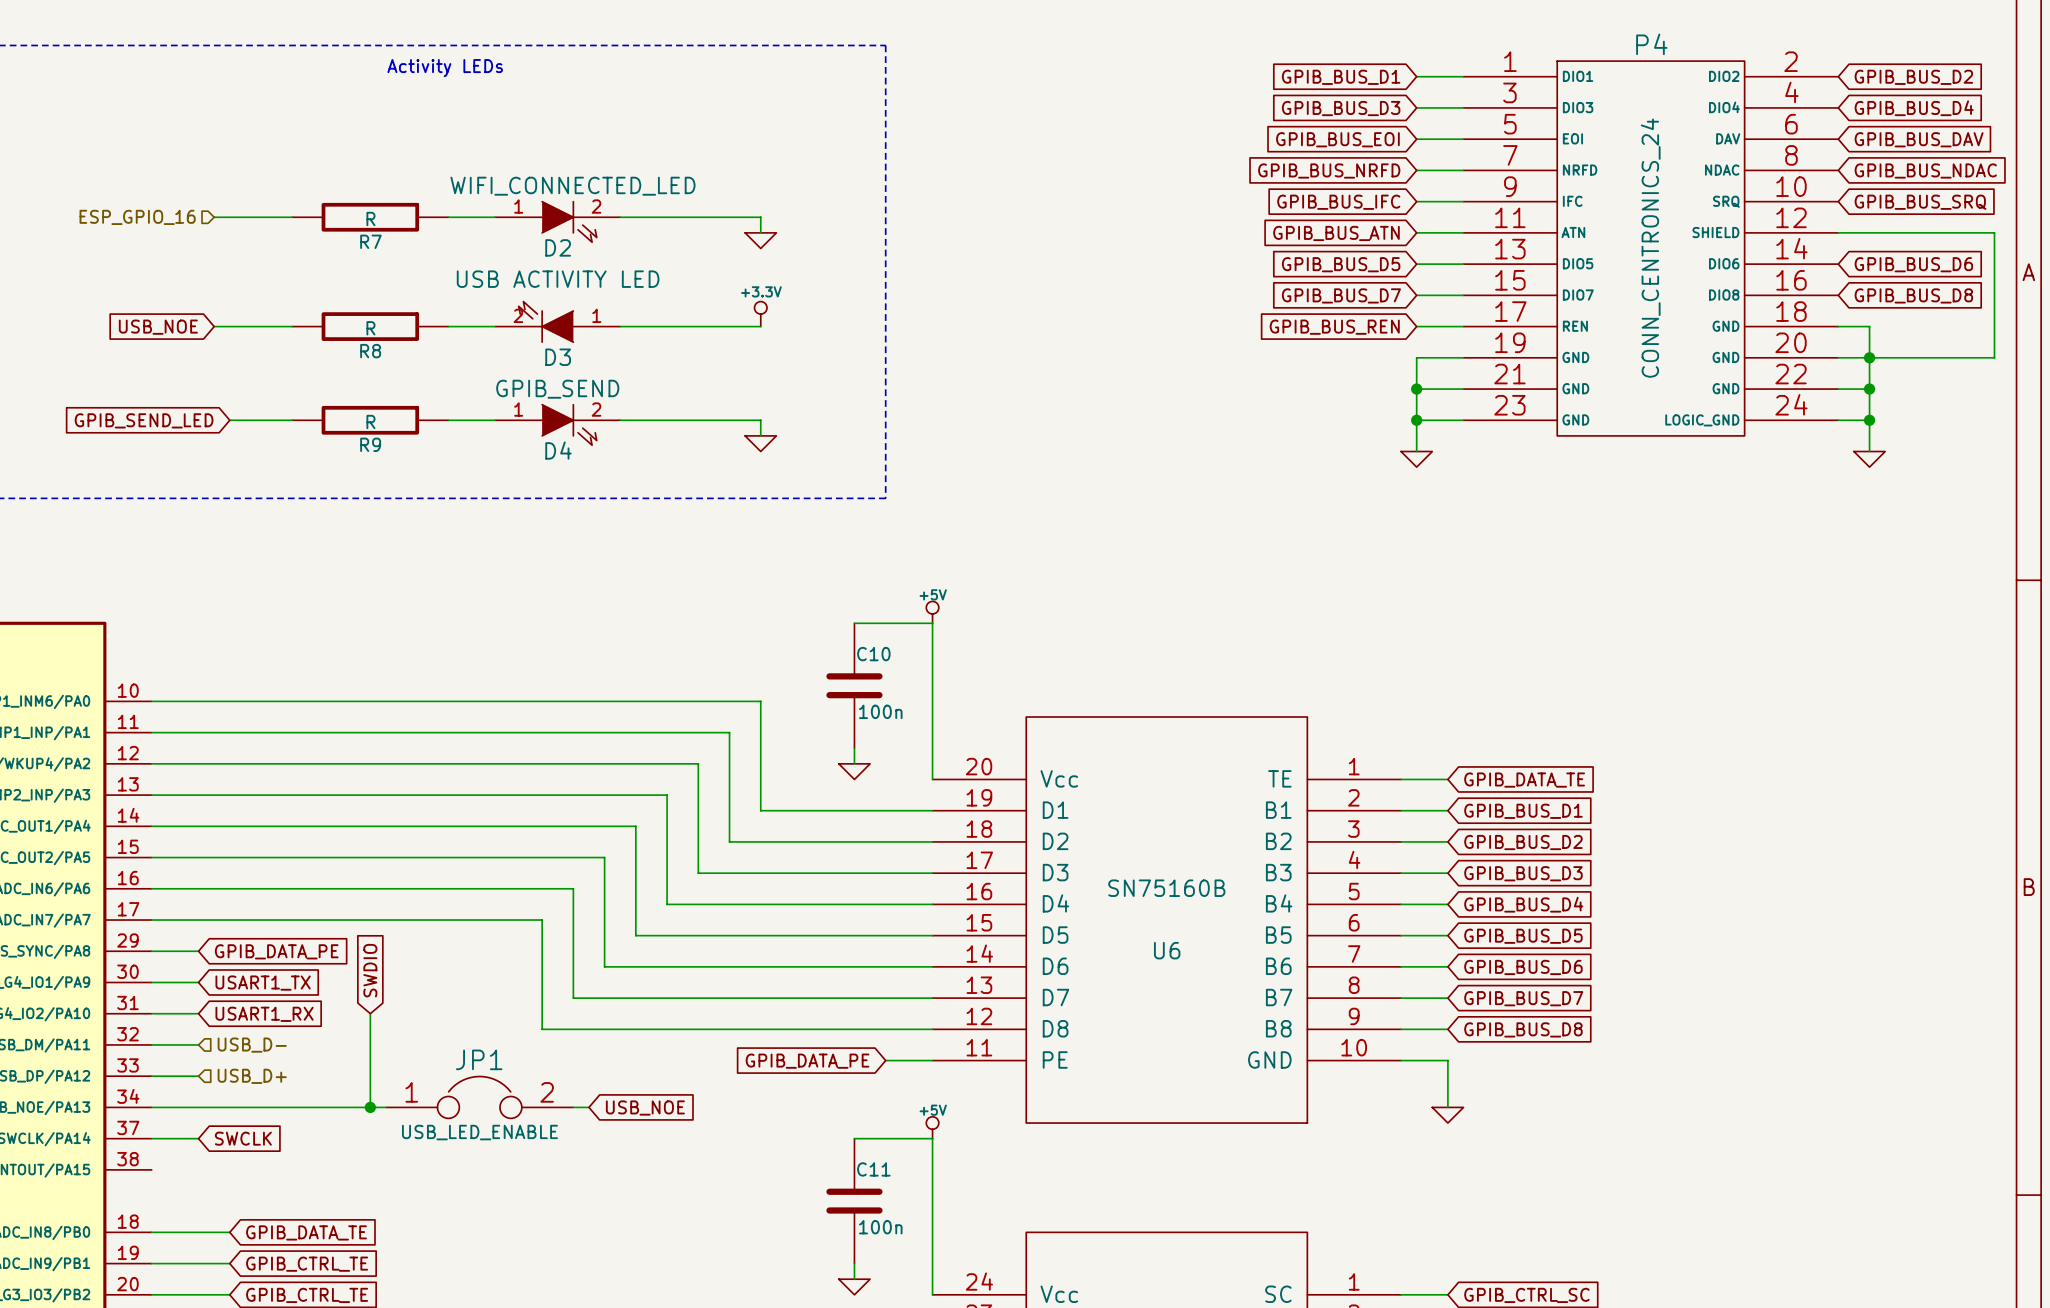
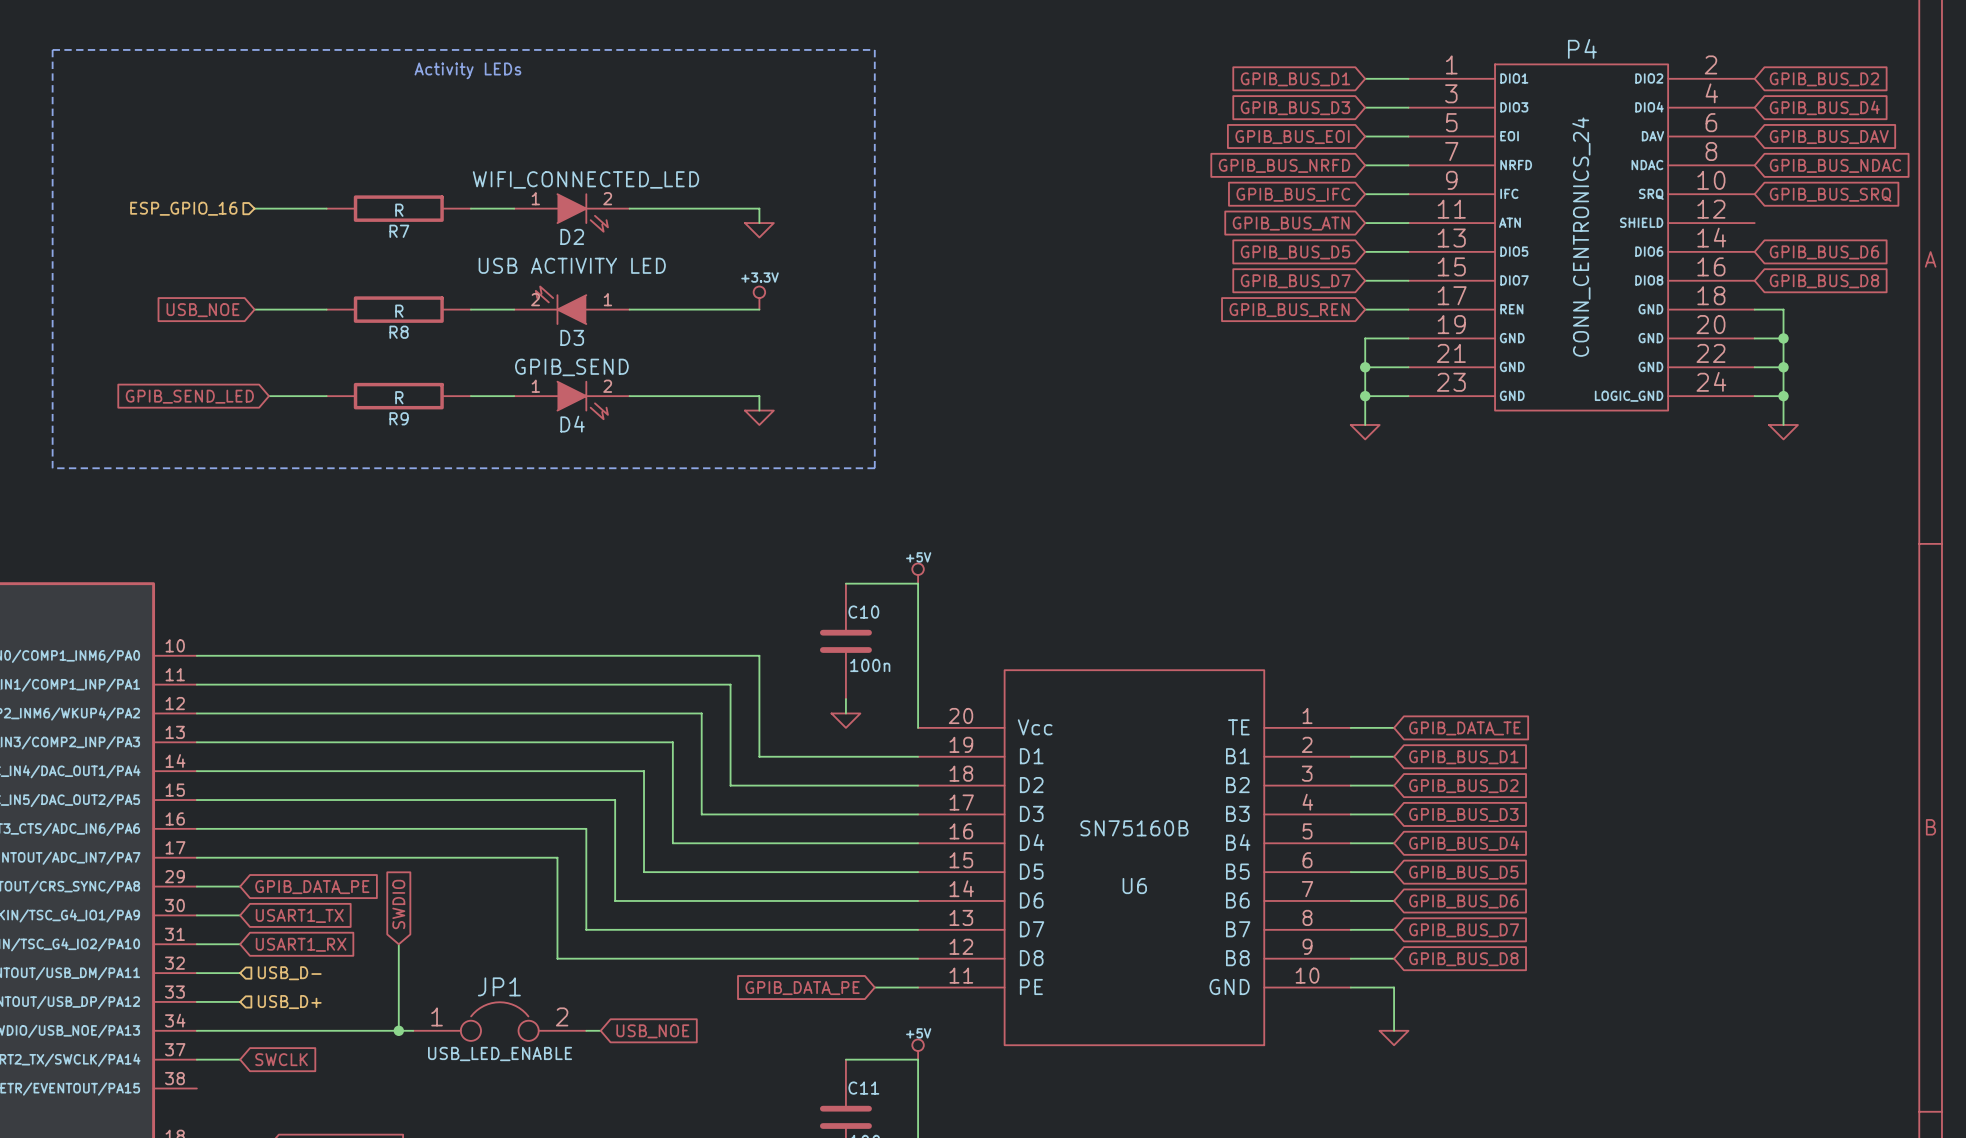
wire: (1838, 232) (1994, 232) (1994, 357) (1869, 357) -> none

